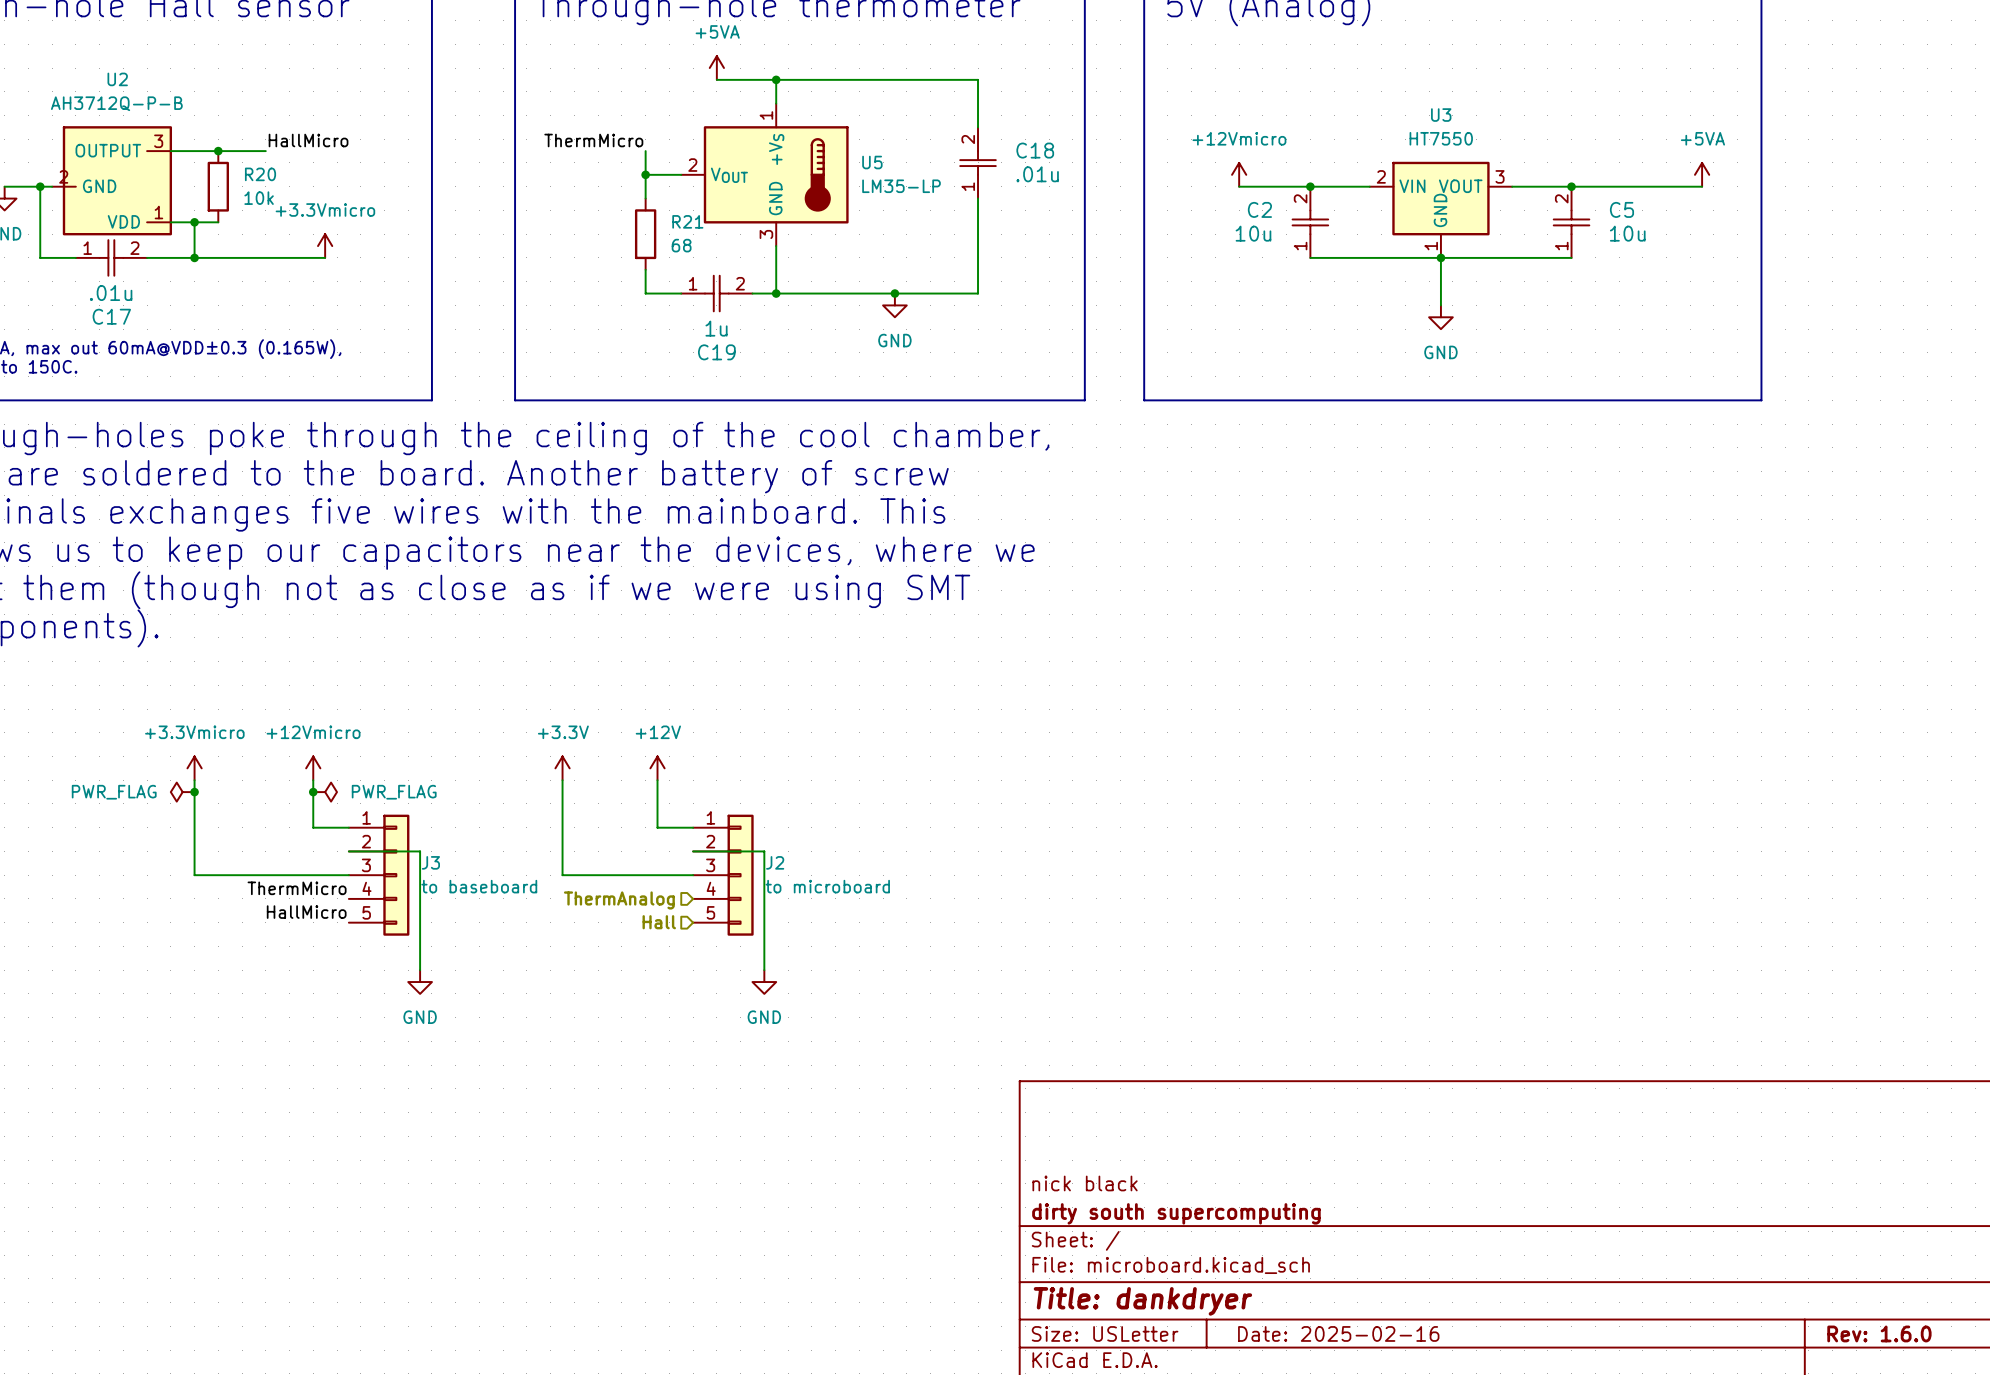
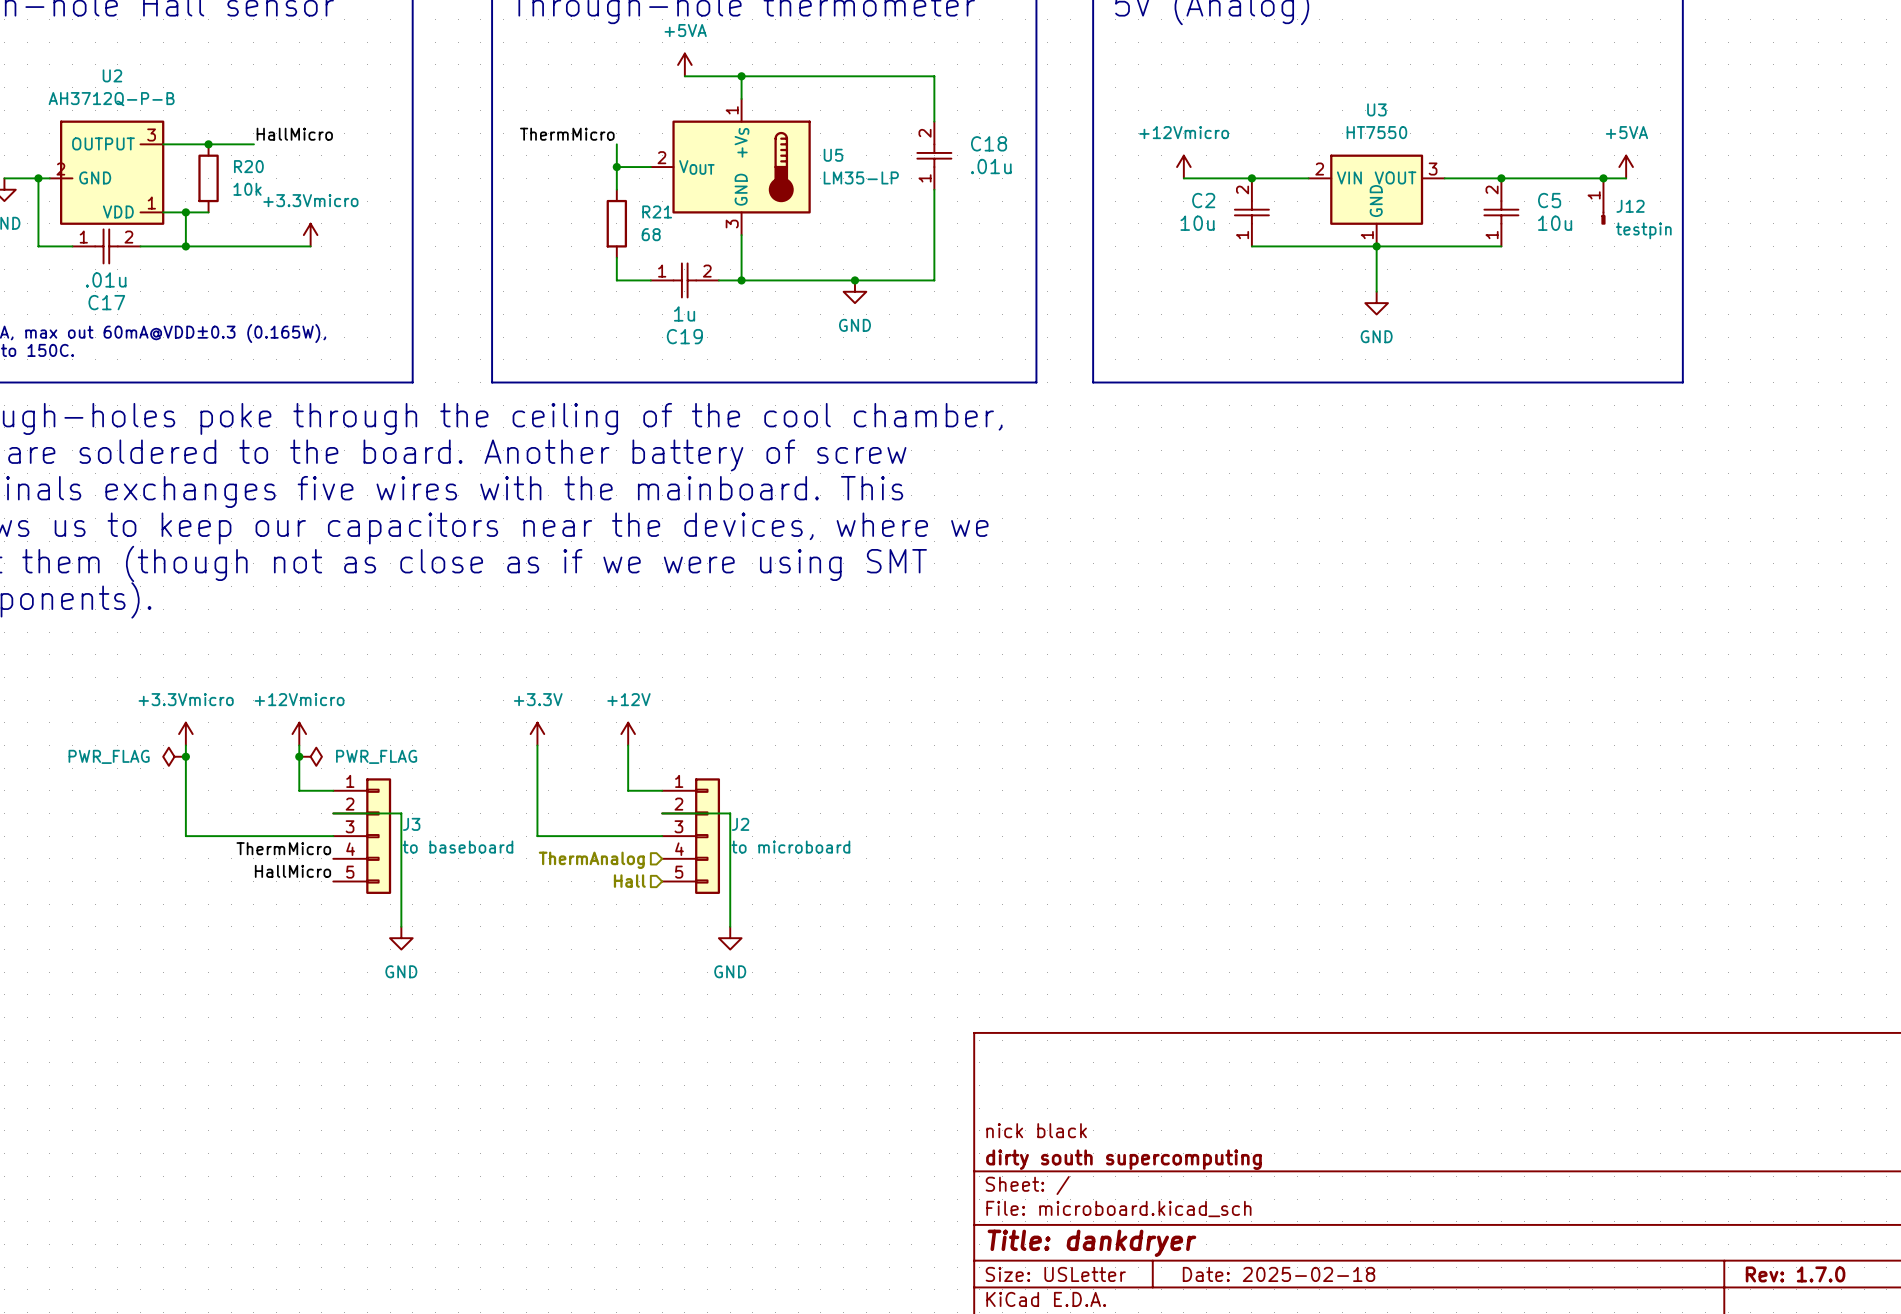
junction: none -> (1603, 178)
J12: none -> testpin (1603, 201)
title block: Date: 2025-02-16 (1338, 1333) -> Date: 2025-02-18 (1279, 1274)
title block: Rev: 1.6.0 (1879, 1333) -> Rev: 1.7.0 (1795, 1274)

